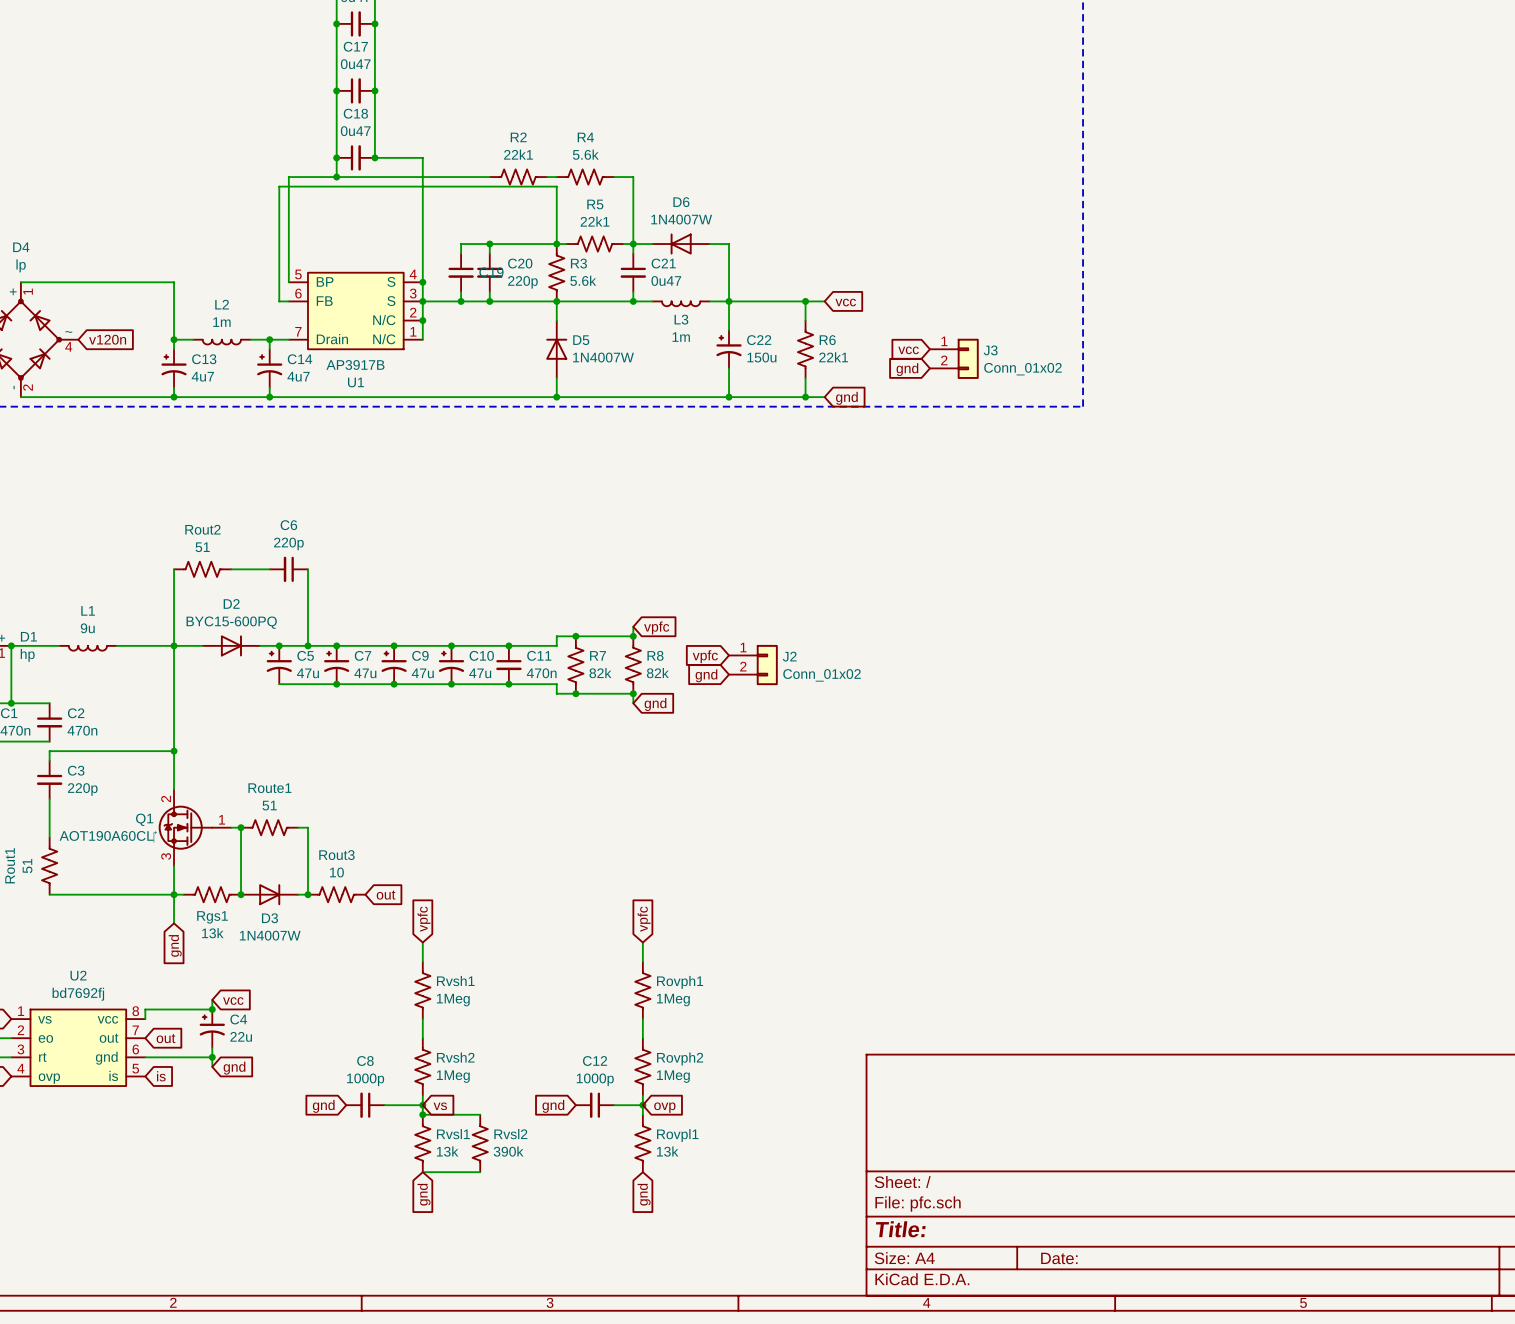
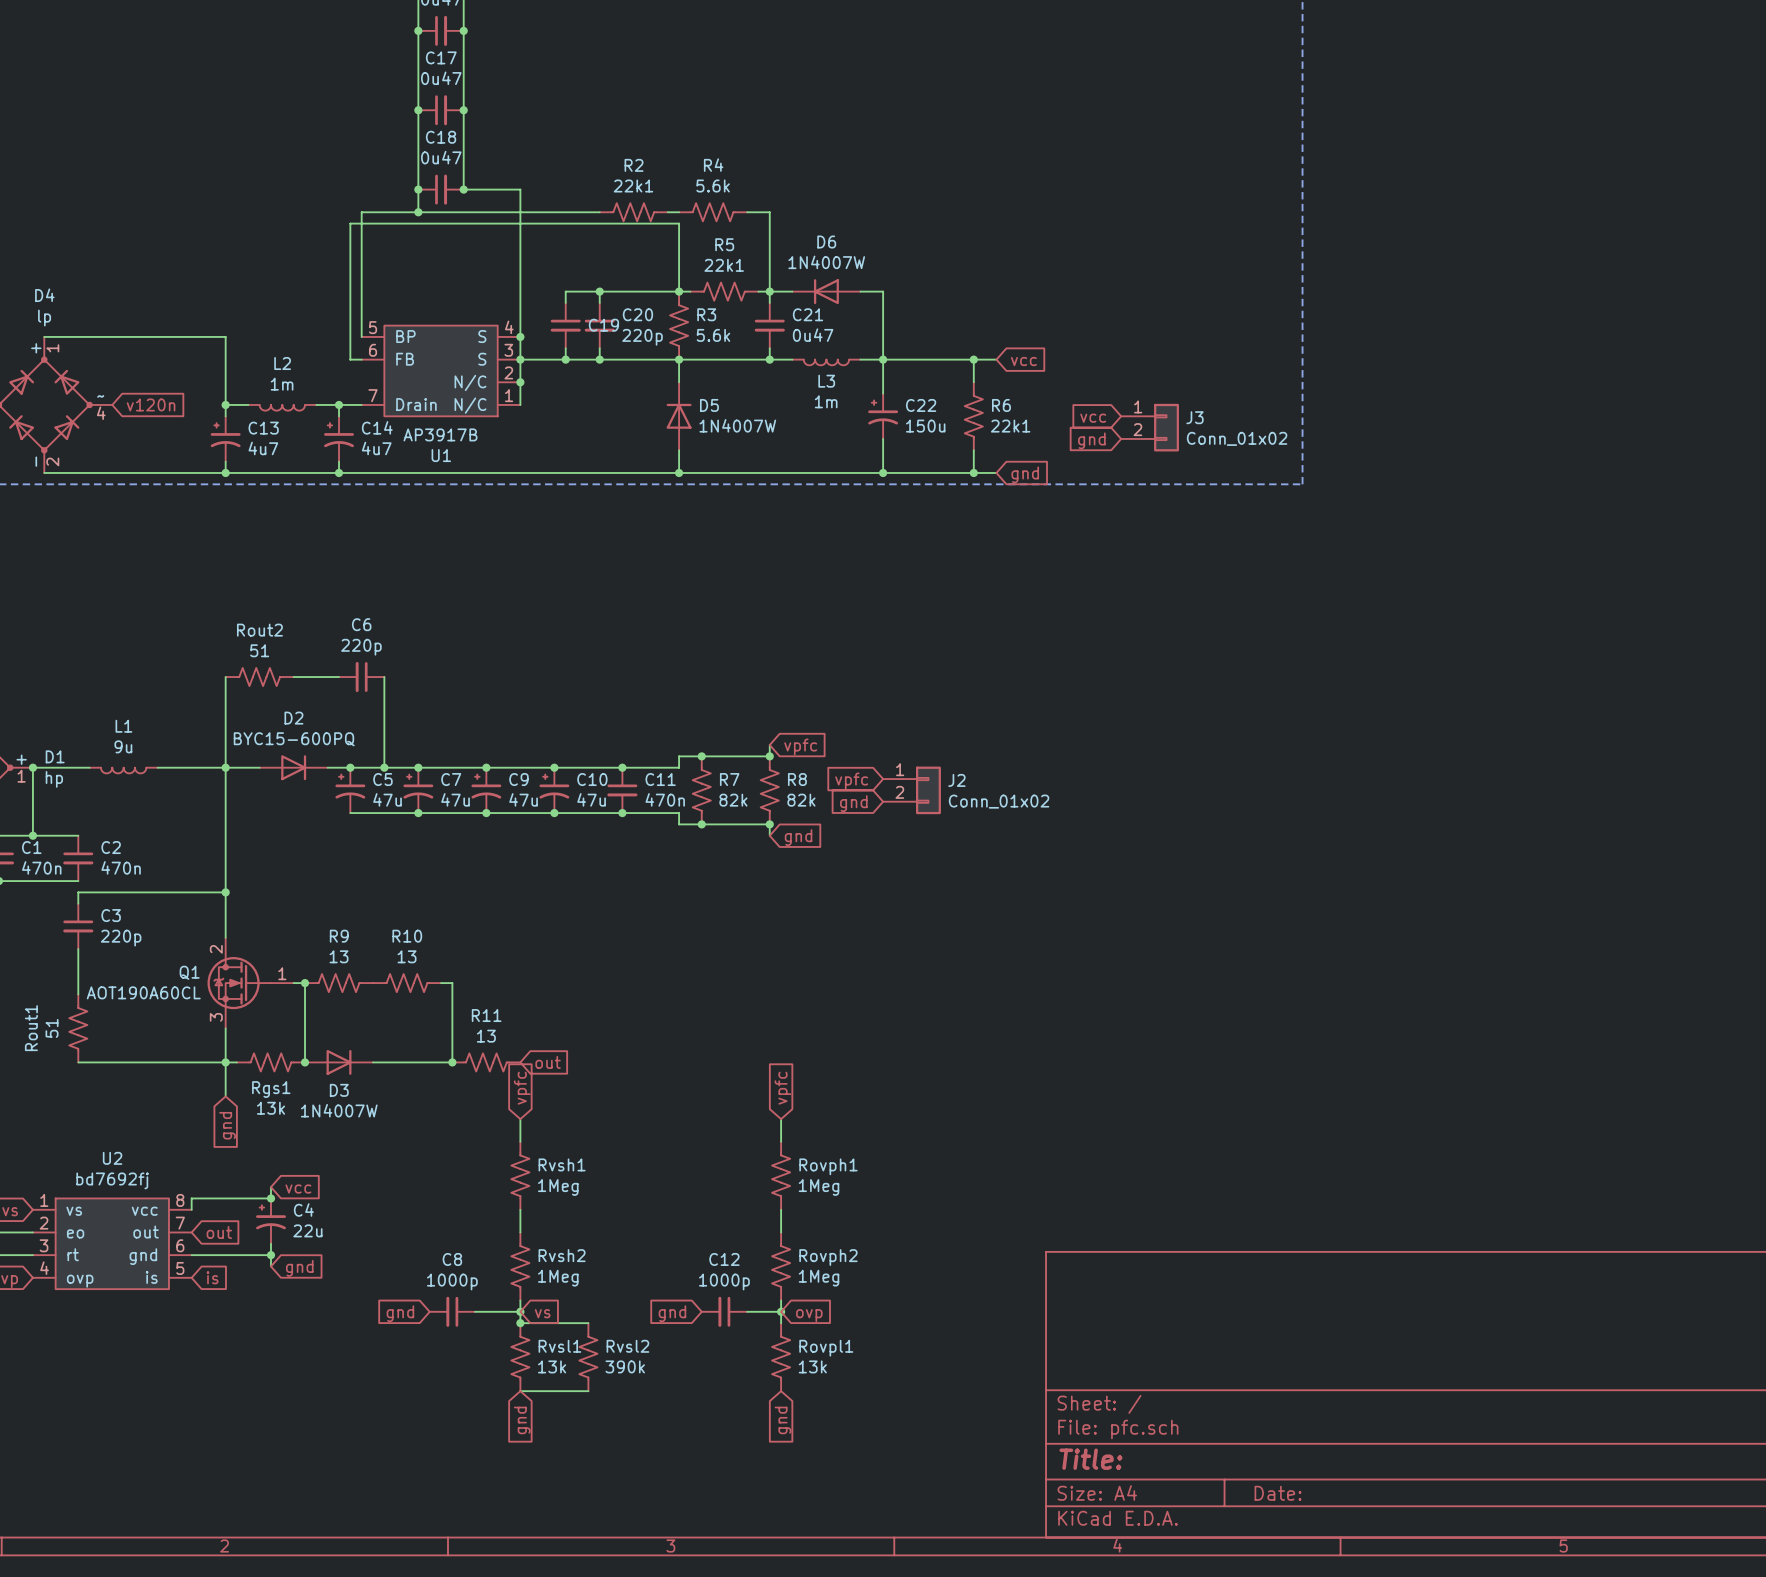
Route1 name: Route1 (269, 788) -> R9 (339, 936)
Route1 value: 51 (269, 805) -> 13 (339, 956)
wire: (298, 827) (307, 827) (307, 894) -> (441, 983) (452, 983) (452, 1062) (384, 1062)
R10: none -> 13 (407, 983)
junction: (307, 894) -> none
Rout3: 10 (336, 894) -> none
junction: none -> (452, 1062)
R11: none -> 13 (486, 1062)
global label position: out (386, 895) -> out (548, 1062)

